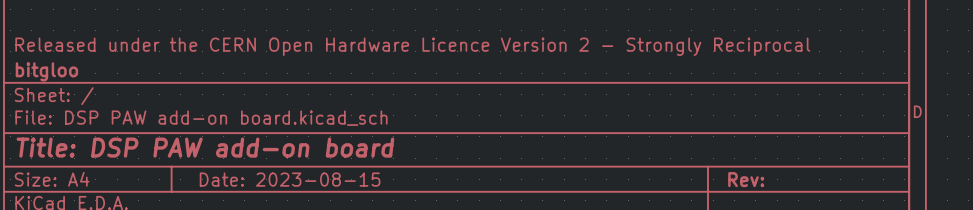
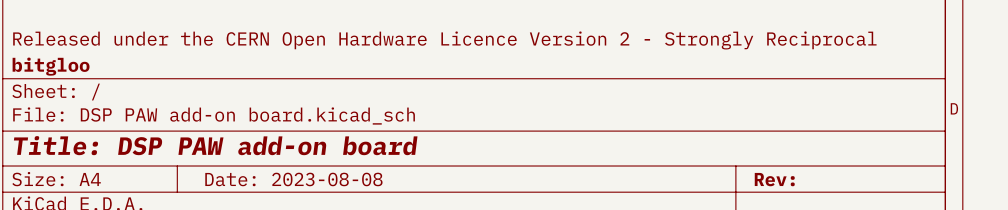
title block: Date: 2023-08-15 (290, 179) -> Date: 2023-08-08 (293, 179)

